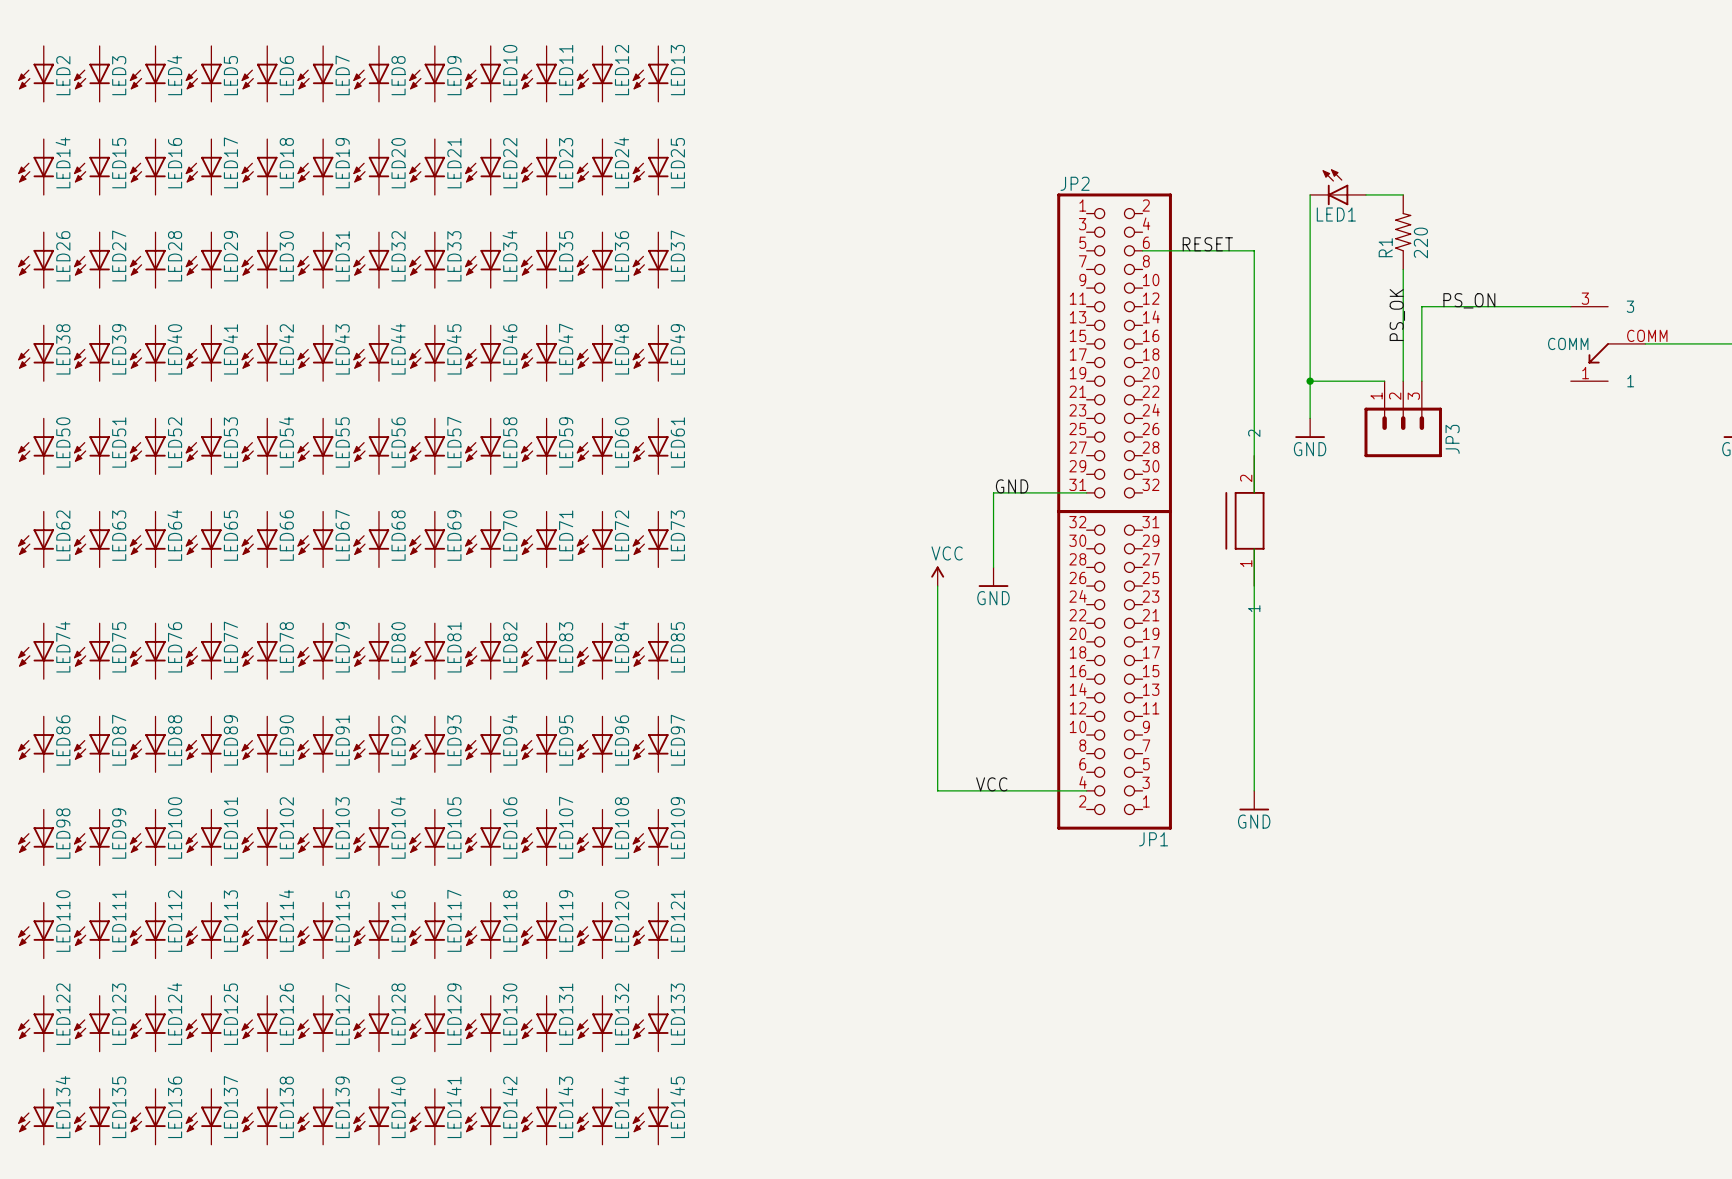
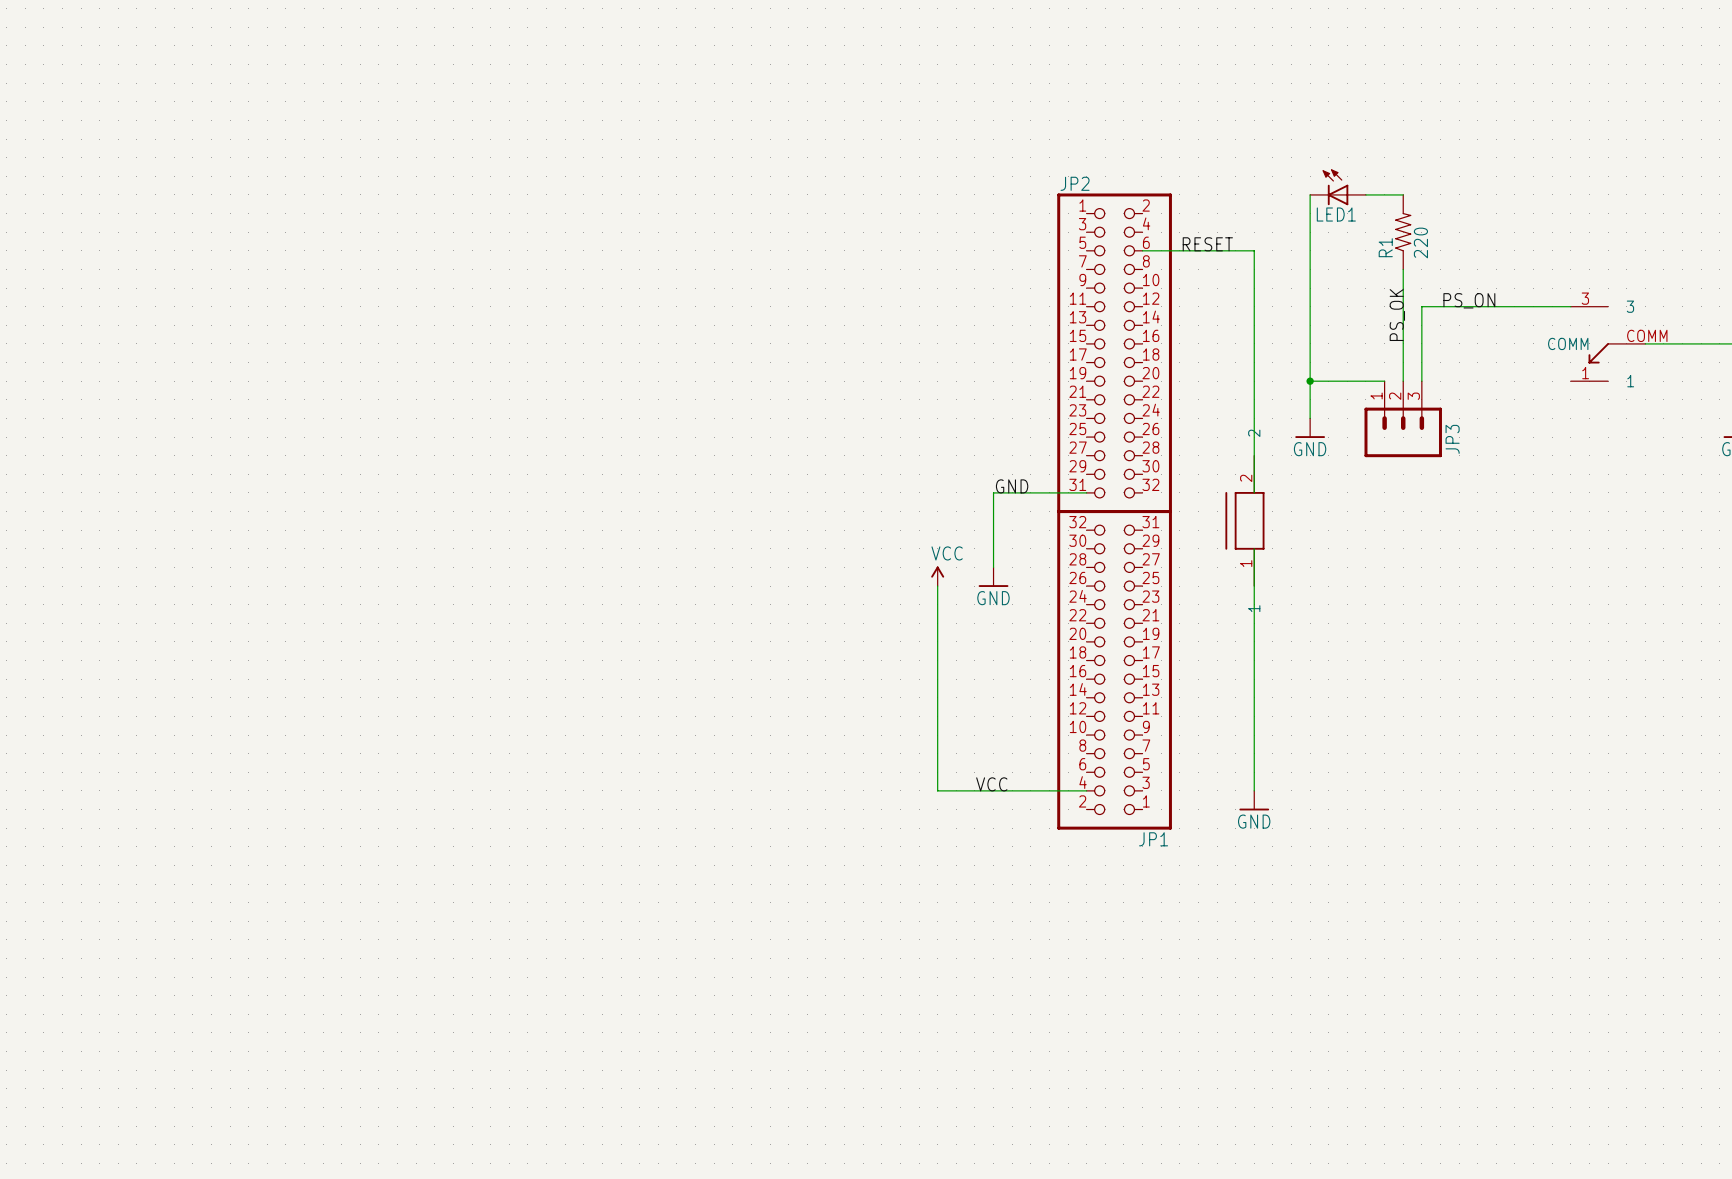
LED2: (36, 73) -> none
LED3: (91, 73) -> none
LED4: (147, 73) -> none
LED5: (203, 73) -> none
LED6: (259, 73) -> none
LED7: (315, 73) -> none
LED8: (371, 73) -> none
LED9: (427, 73) -> none
LED10: (482, 73) -> none
LED11: (538, 73) -> none
LED12: (594, 73) -> none
LED13: (650, 73) -> none
LED14: (36, 167) -> none
LED15: (91, 167) -> none
LED16: (147, 167) -> none
LED17: (203, 167) -> none
LED18: (259, 167) -> none
LED19: (315, 167) -> none
LED20: (371, 167) -> none
LED21: (427, 167) -> none
LED22: (482, 167) -> none
LED23: (538, 167) -> none
LED24: (594, 167) -> none
LED25: (650, 167) -> none
LED26: (36, 260) -> none
LED27: (91, 260) -> none
LED28: (147, 260) -> none
LED29: (203, 260) -> none
LED30: (259, 260) -> none
LED31: (315, 260) -> none
LED32: (371, 260) -> none
LED33: (427, 260) -> none
LED34: (482, 260) -> none
LED35: (538, 260) -> none
LED36: (594, 260) -> none
LED37: (650, 260) -> none
LED38: (36, 353) -> none
LED39: (91, 353) -> none
LED40: (147, 353) -> none
LED41: (203, 353) -> none
LED42: (259, 353) -> none
LED43: (315, 353) -> none
LED44: (371, 353) -> none
LED45: (427, 353) -> none
LED46: (482, 353) -> none
LED47: (538, 353) -> none
LED48: (594, 353) -> none
LED49: (650, 353) -> none
LED50: (36, 446) -> none
LED51: (91, 446) -> none
LED52: (147, 446) -> none
LED53: (203, 446) -> none
LED54: (259, 446) -> none
LED55: (315, 446) -> none
LED56: (371, 446) -> none
LED57: (427, 446) -> none
LED58: (482, 446) -> none
LED59: (538, 446) -> none
LED60: (594, 446) -> none
LED61: (650, 446) -> none
LED62: (36, 539) -> none
LED63: (91, 539) -> none
LED64: (147, 539) -> none
LED65: (203, 539) -> none
LED66: (259, 539) -> none
LED67: (315, 539) -> none
LED68: (371, 539) -> none
LED69: (427, 539) -> none
LED70: (482, 539) -> none
LED71: (538, 539) -> none
LED72: (594, 539) -> none
LED73: (650, 539) -> none
LED74: (36, 651) -> none
LED75: (91, 651) -> none
LED76: (147, 651) -> none
LED77: (203, 651) -> none
LED78: (259, 651) -> none
LED79: (315, 651) -> none
LED80: (371, 651) -> none
LED81: (427, 651) -> none
LED82: (482, 651) -> none
LED83: (538, 651) -> none
LED84: (594, 651) -> none
LED85: (650, 651) -> none
LED86: (36, 744) -> none
LED87: (91, 744) -> none
LED88: (147, 744) -> none
LED89: (203, 744) -> none
LED90: (259, 744) -> none
LED91: (315, 744) -> none
LED92: (371, 744) -> none
LED93: (427, 744) -> none
LED94: (482, 744) -> none
LED95: (538, 744) -> none
LED96: (594, 744) -> none
LED97: (650, 744) -> none
LED98: (36, 837) -> none
LED99: (91, 837) -> none
LED100: (147, 837) -> none
LED101: (203, 837) -> none
LED102: (259, 837) -> none
LED103: (315, 837) -> none
LED104: (371, 837) -> none
LED105: (427, 837) -> none
LED106: (482, 837) -> none
LED107: (538, 837) -> none
LED108: (594, 837) -> none
LED109: (650, 837) -> none
LED110: (36, 930) -> none
LED111: (91, 930) -> none
LED112: (147, 930) -> none
LED113: (203, 930) -> none
LED114: (259, 930) -> none
LED115: (315, 930) -> none
LED116: (371, 930) -> none
LED117: (427, 930) -> none
LED118: (482, 930) -> none
LED119: (538, 930) -> none
LED120: (594, 930) -> none
LED121: (650, 930) -> none
LED122: (36, 1023) -> none
LED123: (91, 1023) -> none
LED124: (147, 1023) -> none
LED125: (203, 1023) -> none
LED126: (259, 1023) -> none
LED127: (315, 1023) -> none
LED128: (371, 1023) -> none
LED129: (427, 1023) -> none
LED130: (482, 1023) -> none
LED131: (538, 1023) -> none
LED132: (594, 1023) -> none
LED133: (650, 1023) -> none
LED134: (36, 1116) -> none
LED135: (91, 1116) -> none
LED136: (147, 1116) -> none
LED137: (203, 1116) -> none
LED138: (259, 1116) -> none
LED139: (315, 1116) -> none
LED140: (371, 1116) -> none
LED141: (427, 1116) -> none
LED142: (482, 1116) -> none
LED143: (538, 1116) -> none
LED144: (594, 1116) -> none
LED145: (650, 1116) -> none

